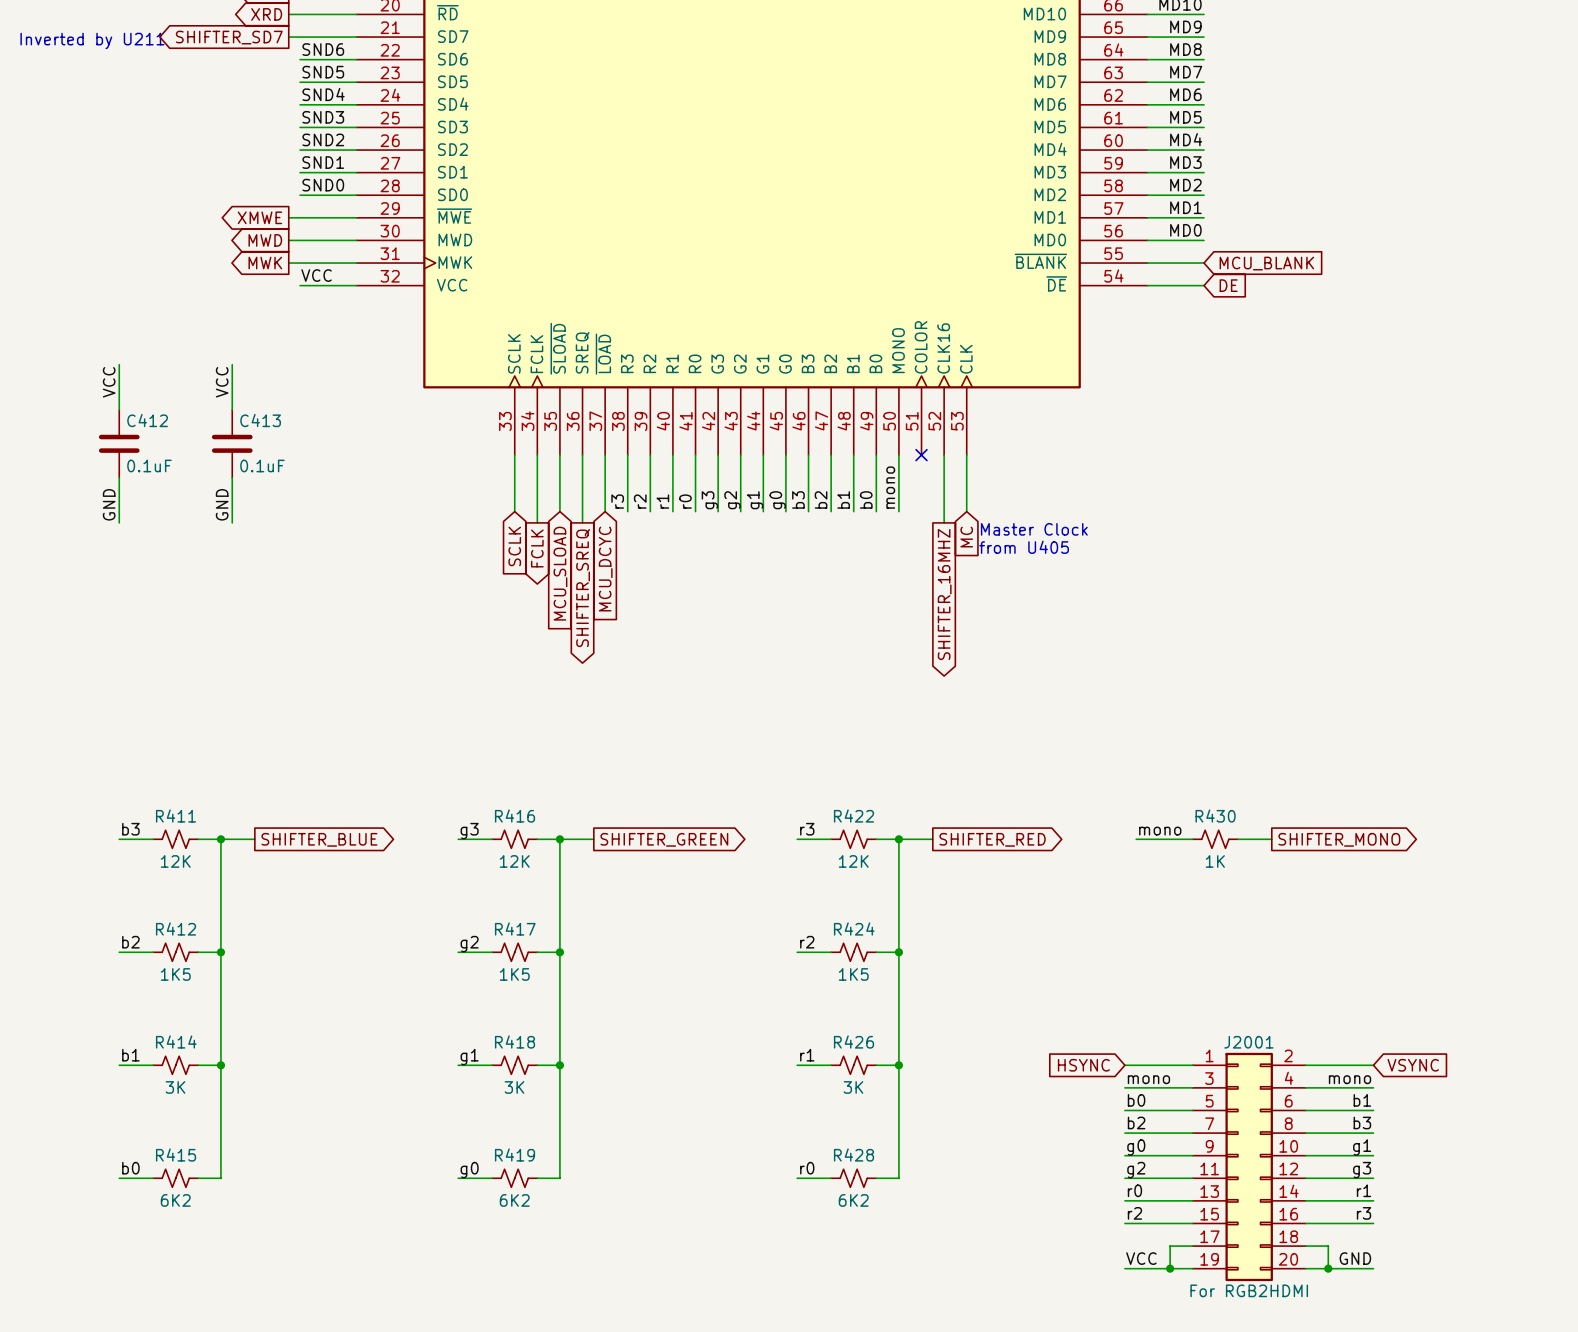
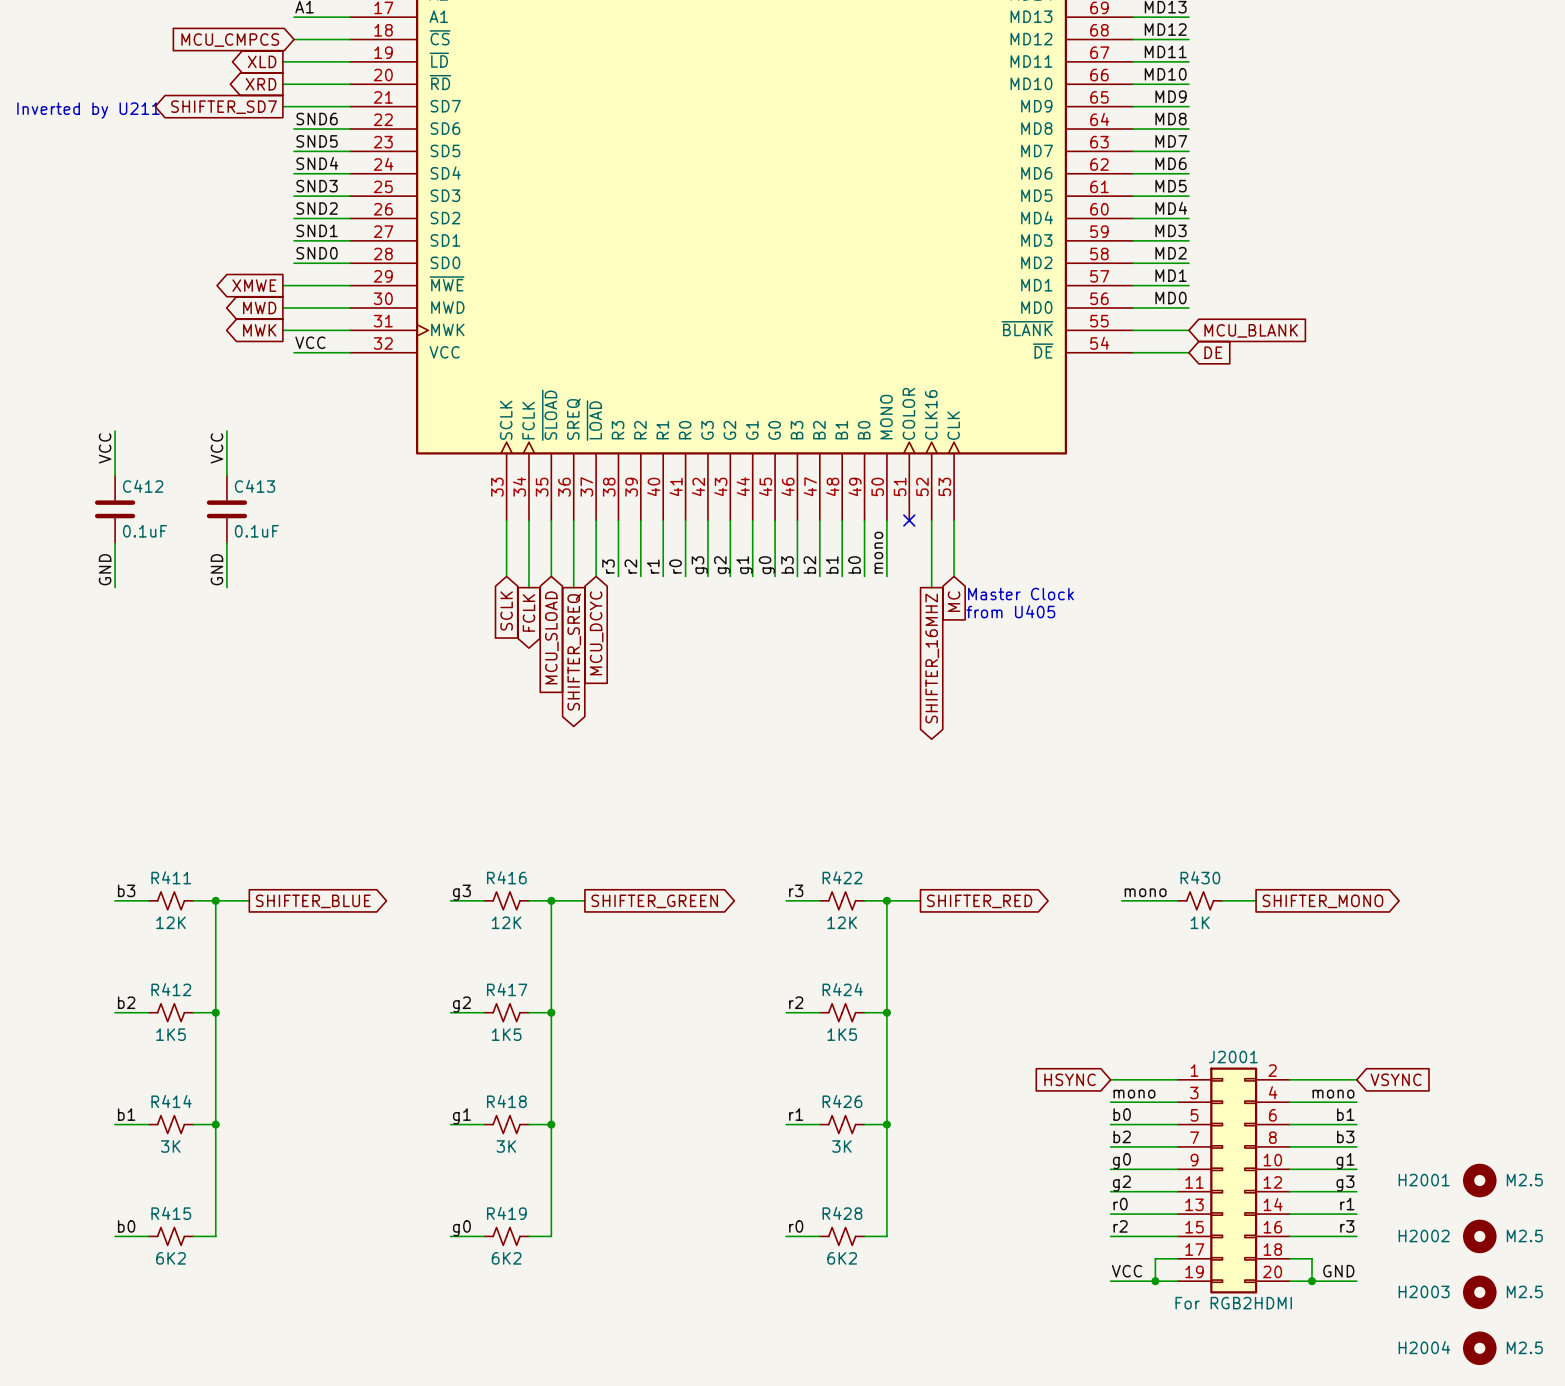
wire: none -> (1110, 1079) (1177, 1079)
wire: none -> (1289, 1079) (1356, 1079)
label: none -> mono (1134, 1094)
label: none -> mono (1333, 1094)
wire: none -> (1110, 1102) (1177, 1102)
wire: none -> (1289, 1102) (1356, 1102)
label: none -> b0 (1122, 1114)
label: none -> b1 (1345, 1114)
global label position: HSYNC (1083, 1065) -> HSYNC (1070, 1079)
global label position: VSYNC (1413, 1065) -> VSYNC (1396, 1079)
label: mono (1148, 1079) -> b2 (1122, 1136)
label: mono (1350, 1079) -> b3 (1345, 1136)
label: b0 (1136, 1100) -> g0 (1121, 1161)
label: b1 (1362, 1100) -> g1 (1345, 1161)
H2001: none -> M2.5 (1479, 1180)
label: b2 (1136, 1123) -> g2 (1121, 1183)
label: b3 (1362, 1123) -> g3 (1345, 1183)
label: g0 (1136, 1147) -> r0 (1120, 1204)
label: g1 (1362, 1147) -> r1 (1347, 1204)
J2001 position: (1249, 1166) -> (1233, 1180)
label: g2 (1136, 1170) -> r2 (1120, 1226)
label: g3 (1362, 1170) -> r3 (1347, 1226)
H2002: none -> M2.5 (1479, 1236)
label: r0 (1134, 1190) -> none
label: r1 (1364, 1190) -> none
wire: (1124, 1200) (1170, 1200) -> (1155, 1281) (1155, 1258)
wire: (1328, 1200) (1373, 1200) -> (1312, 1258) (1312, 1281)
label: r2 (1134, 1213) -> VCC (1126, 1271)
label: r3 (1364, 1213) -> GND (1338, 1271)
H2003: none -> M2.5 (1479, 1292)
wire: (1192, 1246) (1170, 1246) (1170, 1268) -> none
wire: (1305, 1246) (1328, 1246) (1328, 1268) -> none
label: VCC (1141, 1258) -> none
label: GND (1355, 1258) -> none
wire: (1124, 1268) (1192, 1268) -> none
junction position: (1170, 1268) -> (1155, 1281)
wire: (1305, 1268) (1373, 1268) -> none
junction position: (1328, 1268) -> (1312, 1281)
H2004: none -> M2.5 (1479, 1348)

